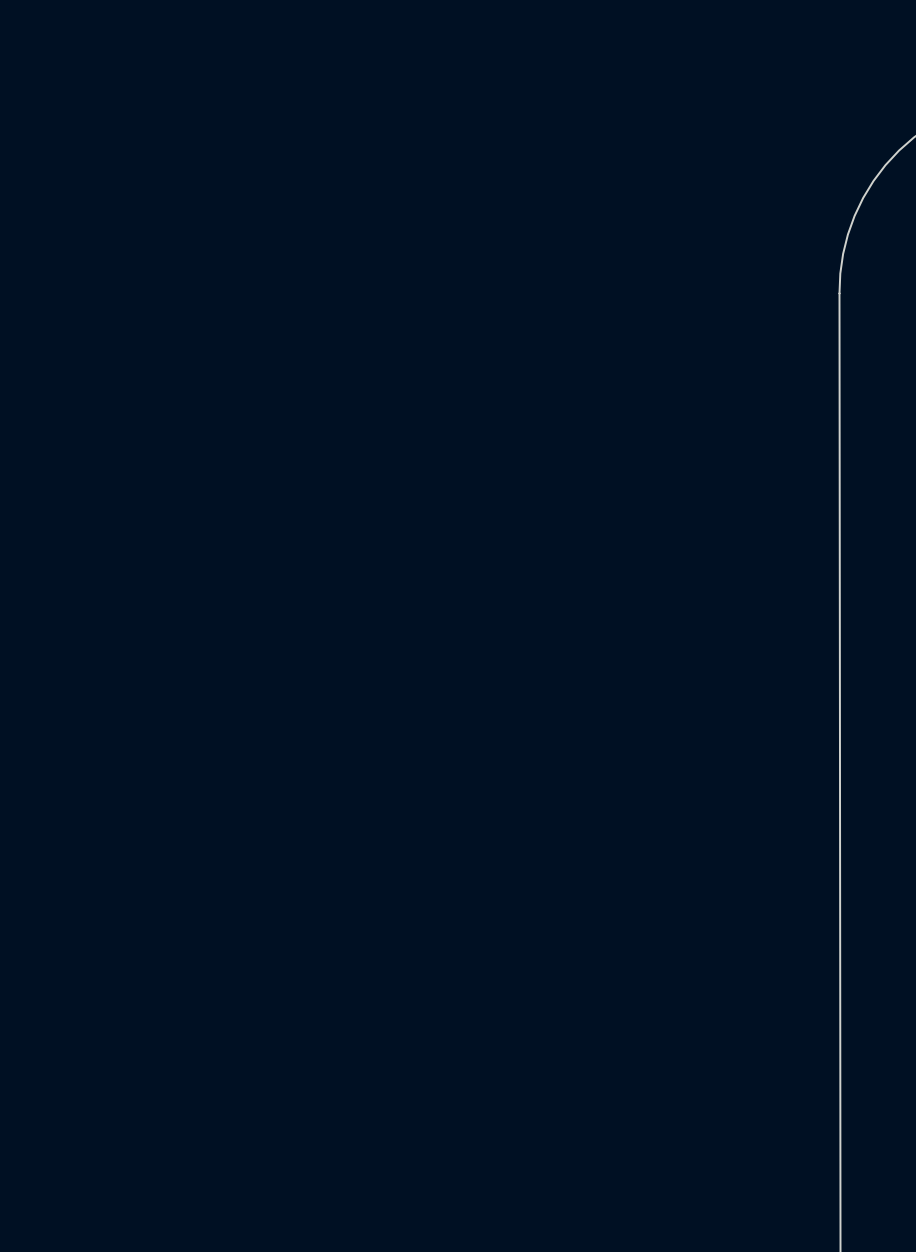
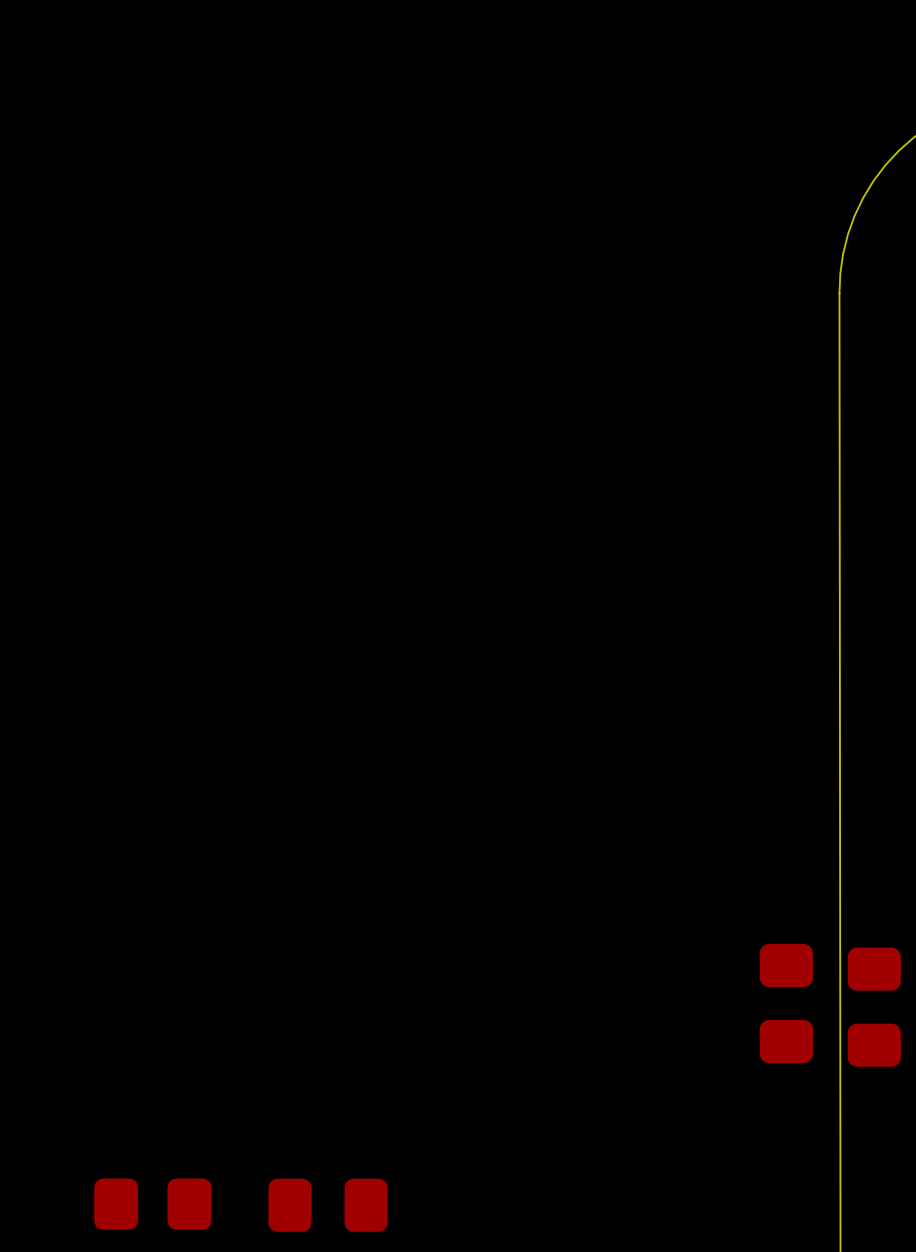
part: none -> (786, 1003)
part: none -> (874, 1007)
part: none -> (152, 1204)
part: none -> (328, 1205)

